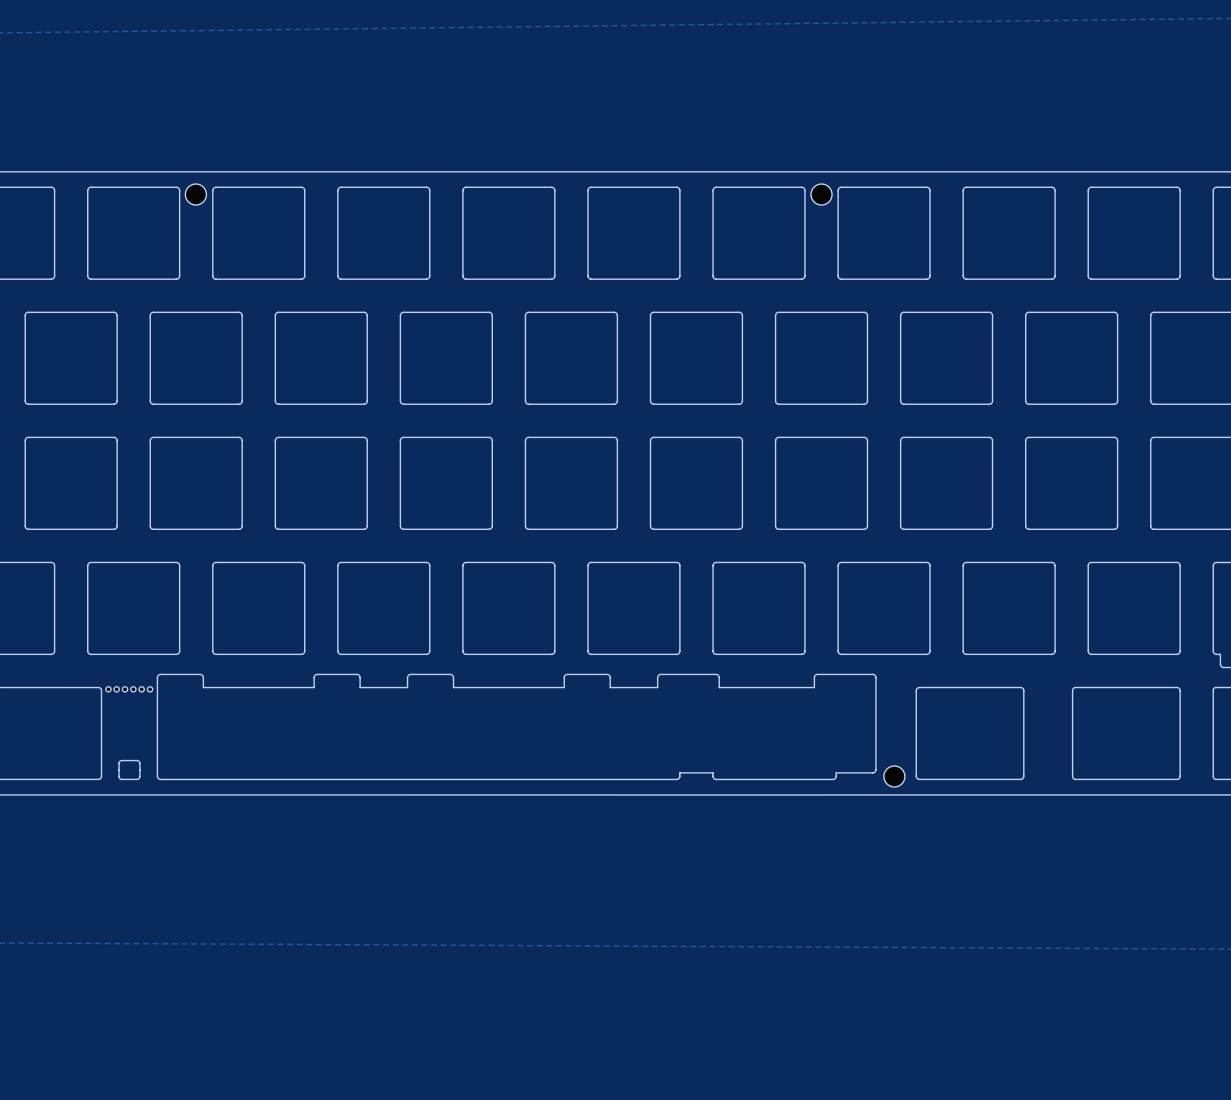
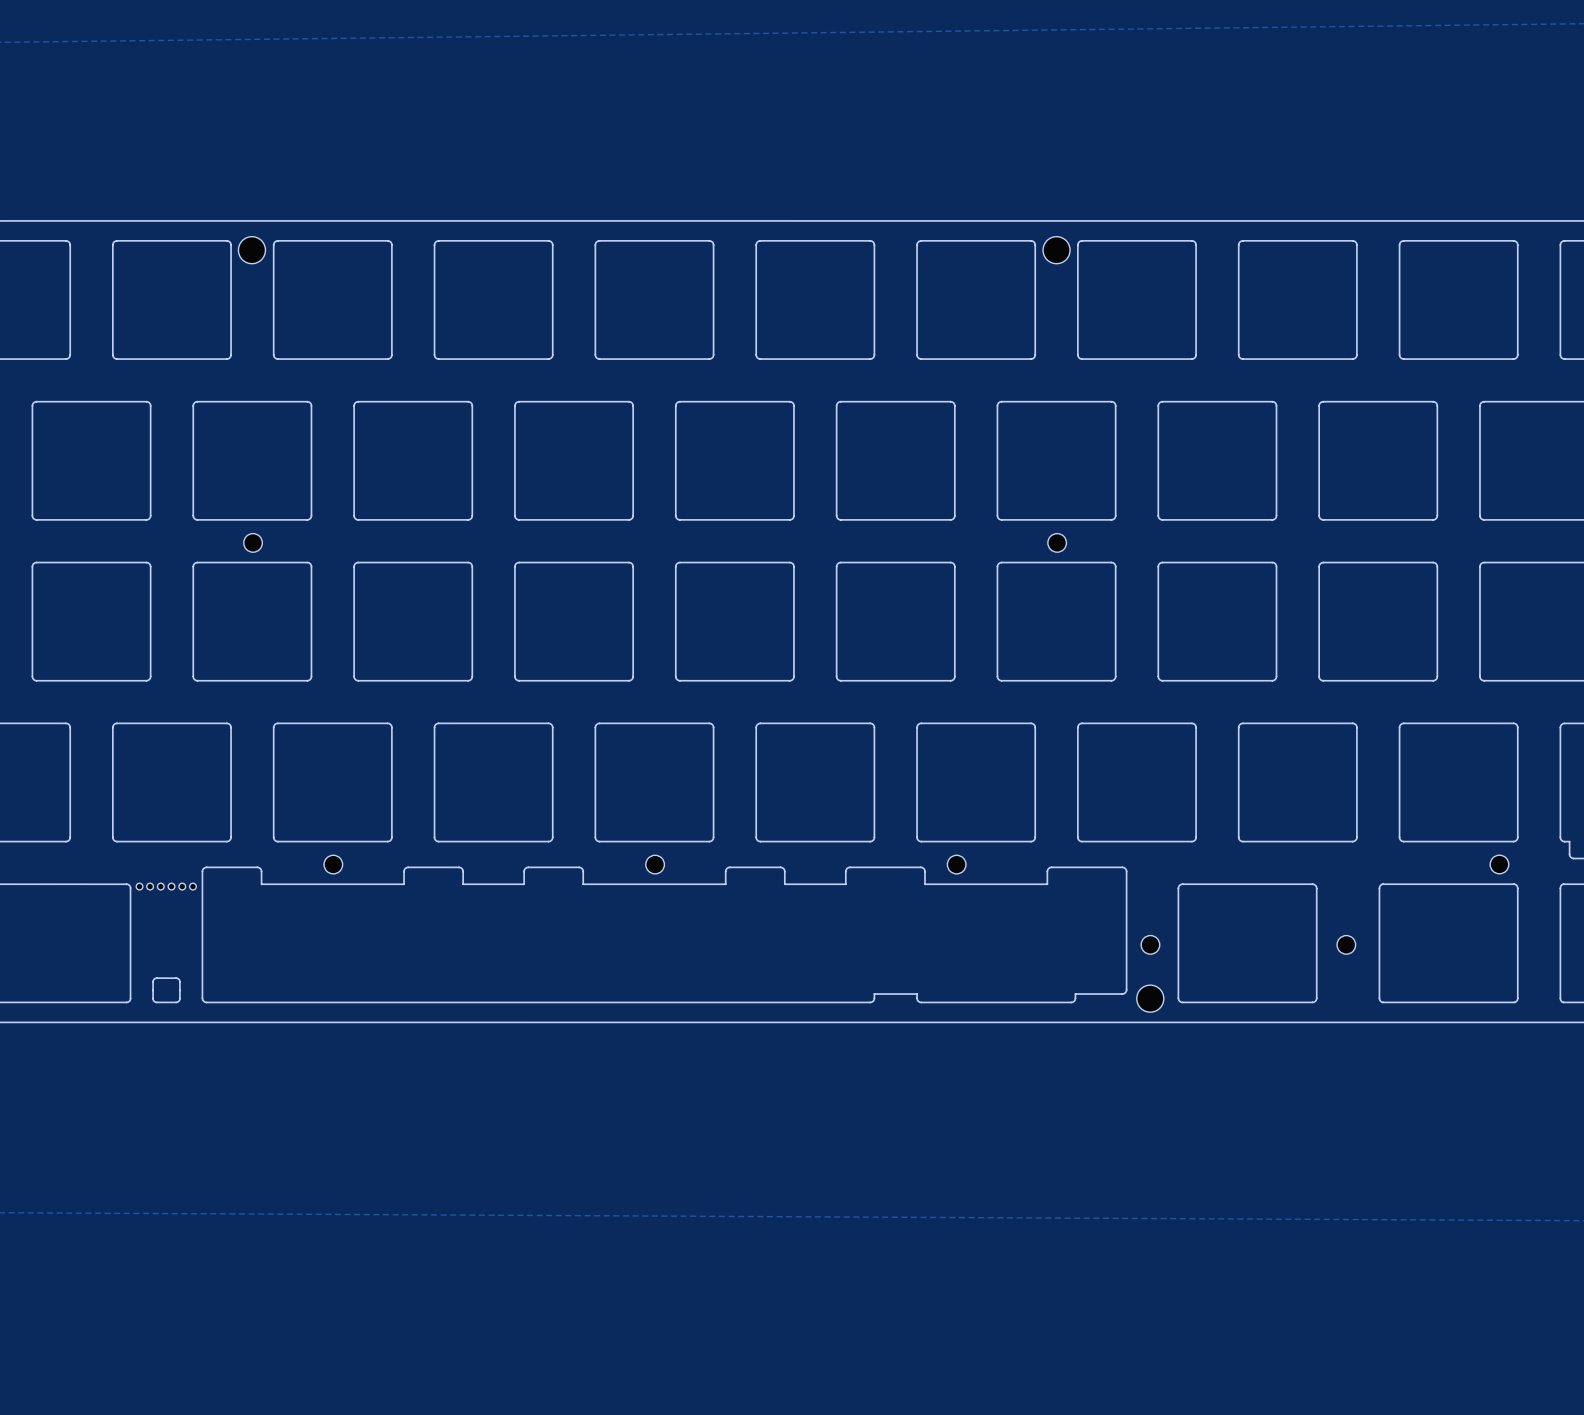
part: none -> (253, 542)
part: none -> (1057, 542)
part: none -> (333, 864)
part: none -> (655, 864)
part: none -> (956, 864)
part: none -> (1499, 864)
part: none -> (1150, 944)
part: none -> (1346, 944)

